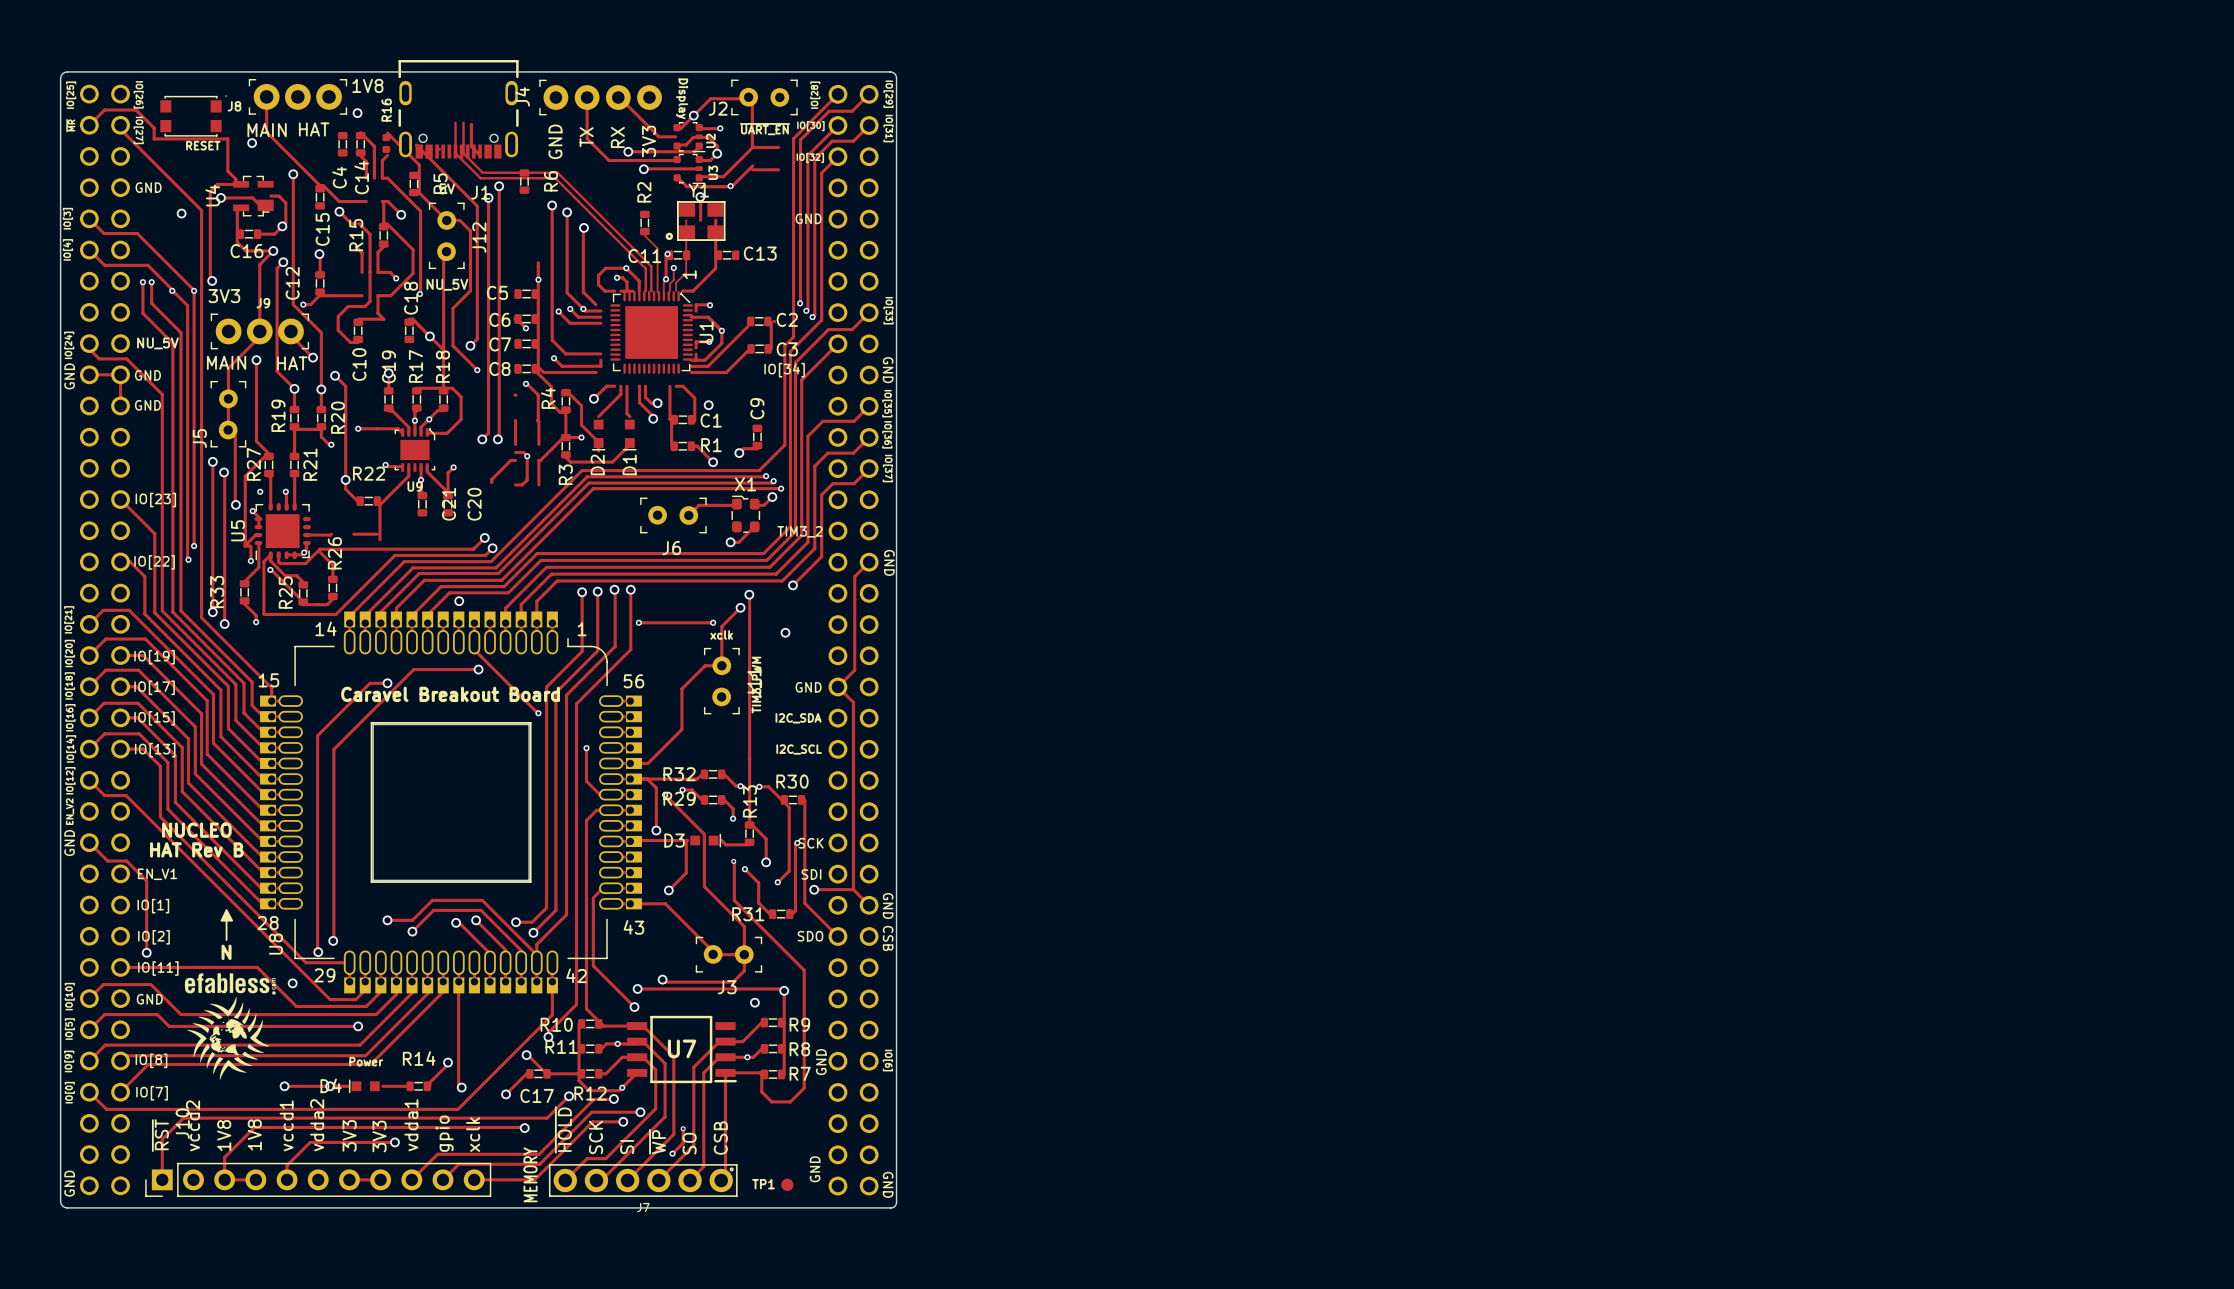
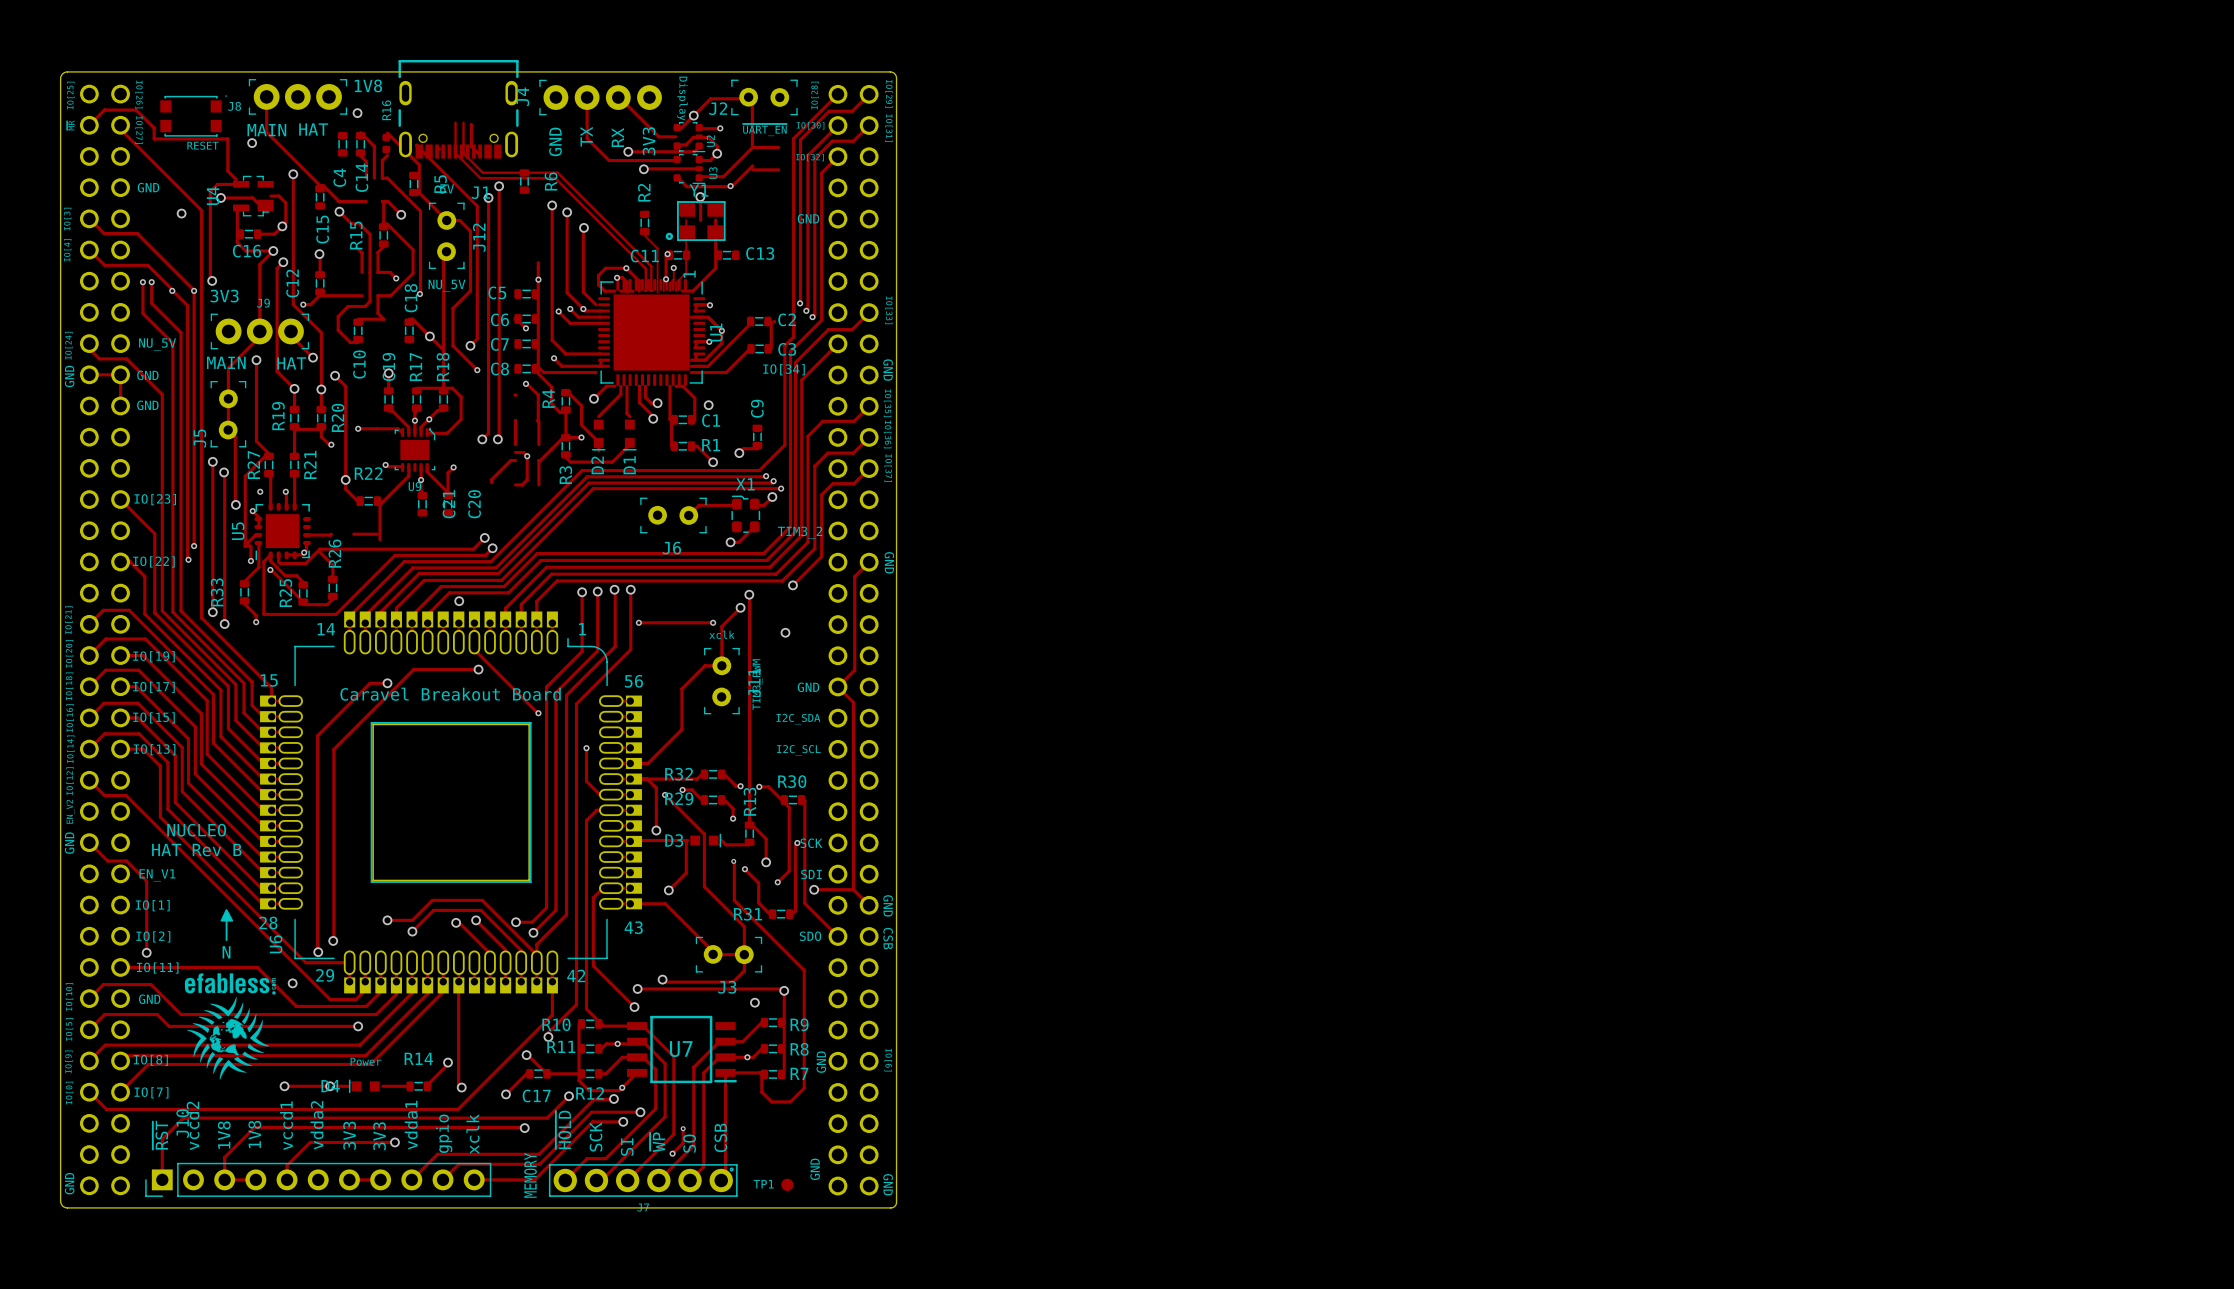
U1 footprint: [610, 291, 694, 374] -> [598, 279, 706, 386]
U8 name: U8 (275, 944) -> U6 (276, 944)

